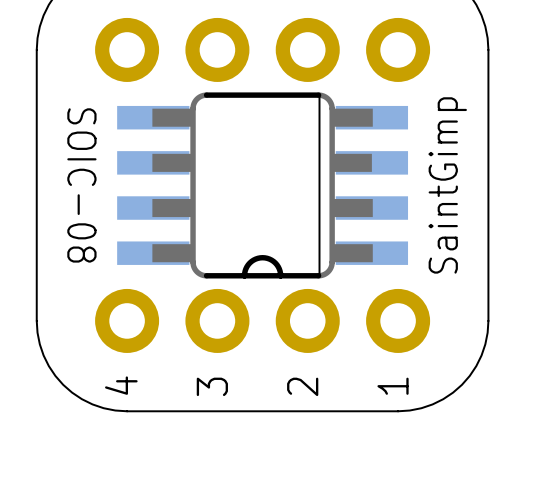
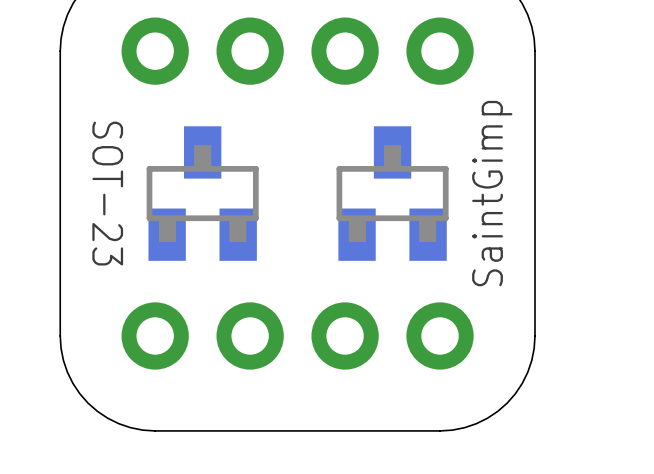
text: SOIC-08 (81, 185) -> SOT-23 (107, 193)
part: none -> (202, 193)
part: (262, 185) -> none
part: none -> (392, 193)
text: 4 (121, 385) -> none
text: 3 (212, 386) -> none
text: 2 (302, 386) -> none
text: 1 (393, 386) -> none

